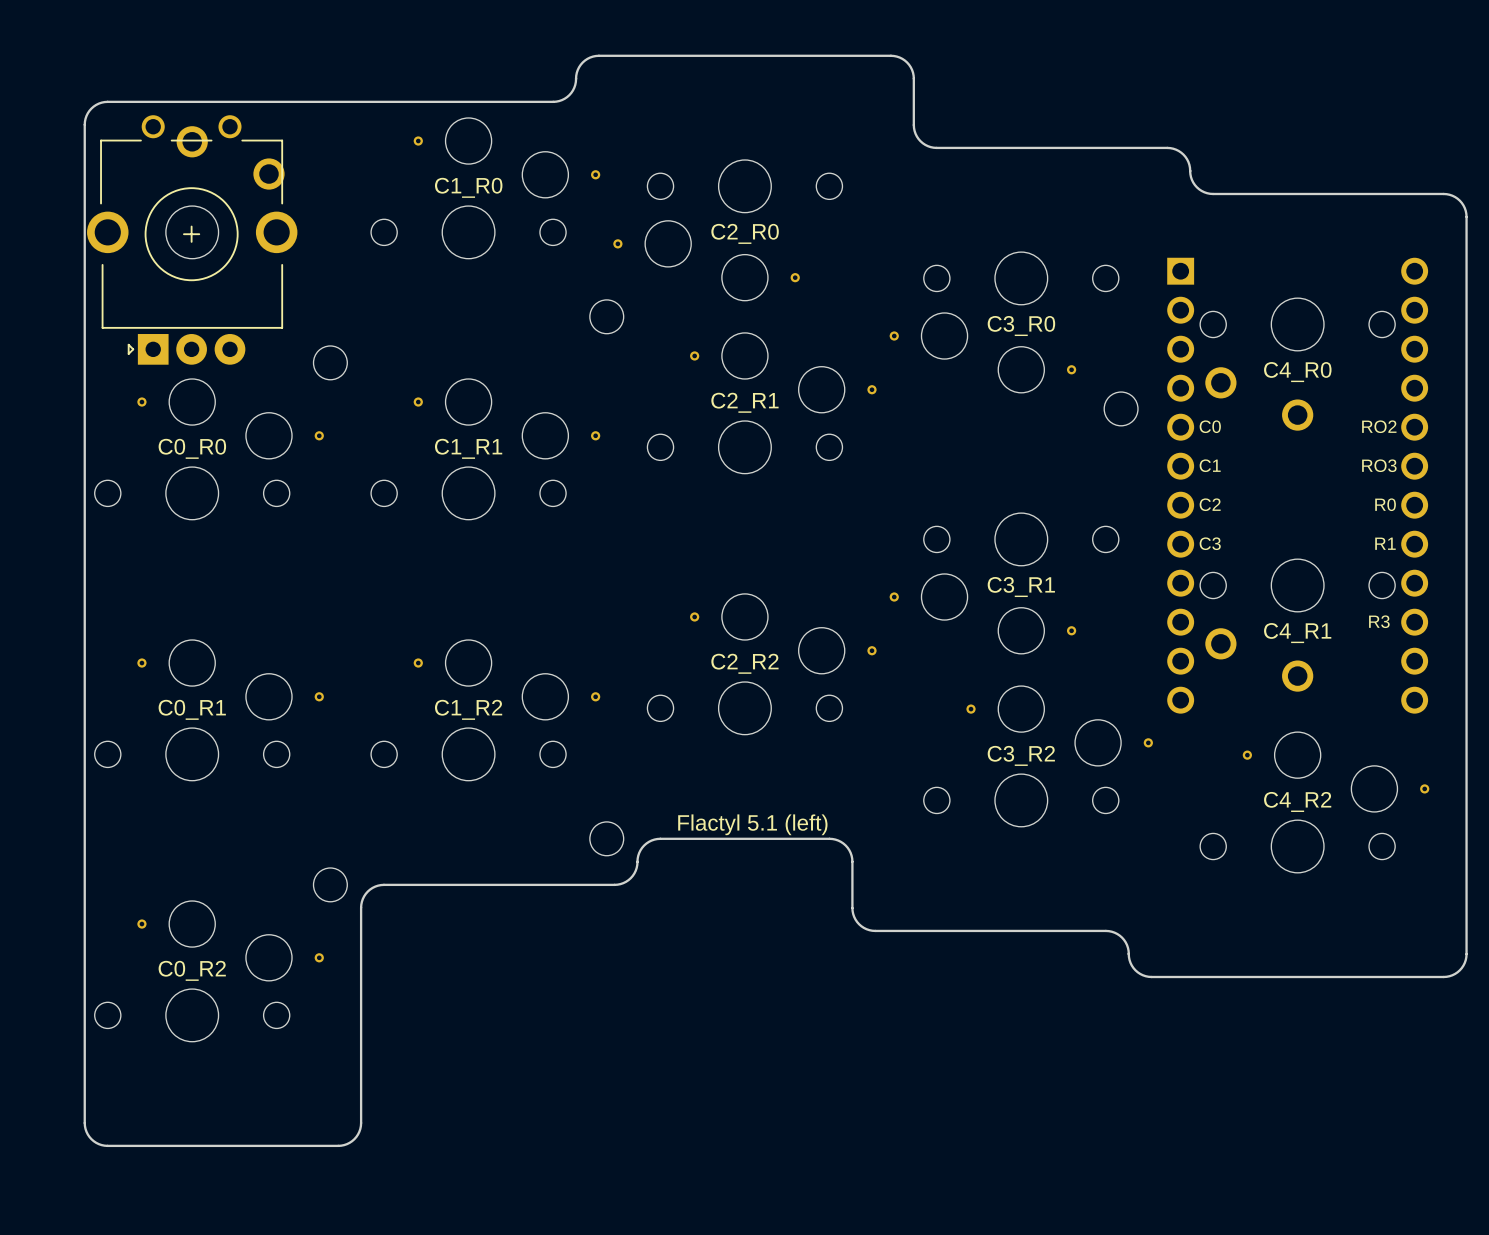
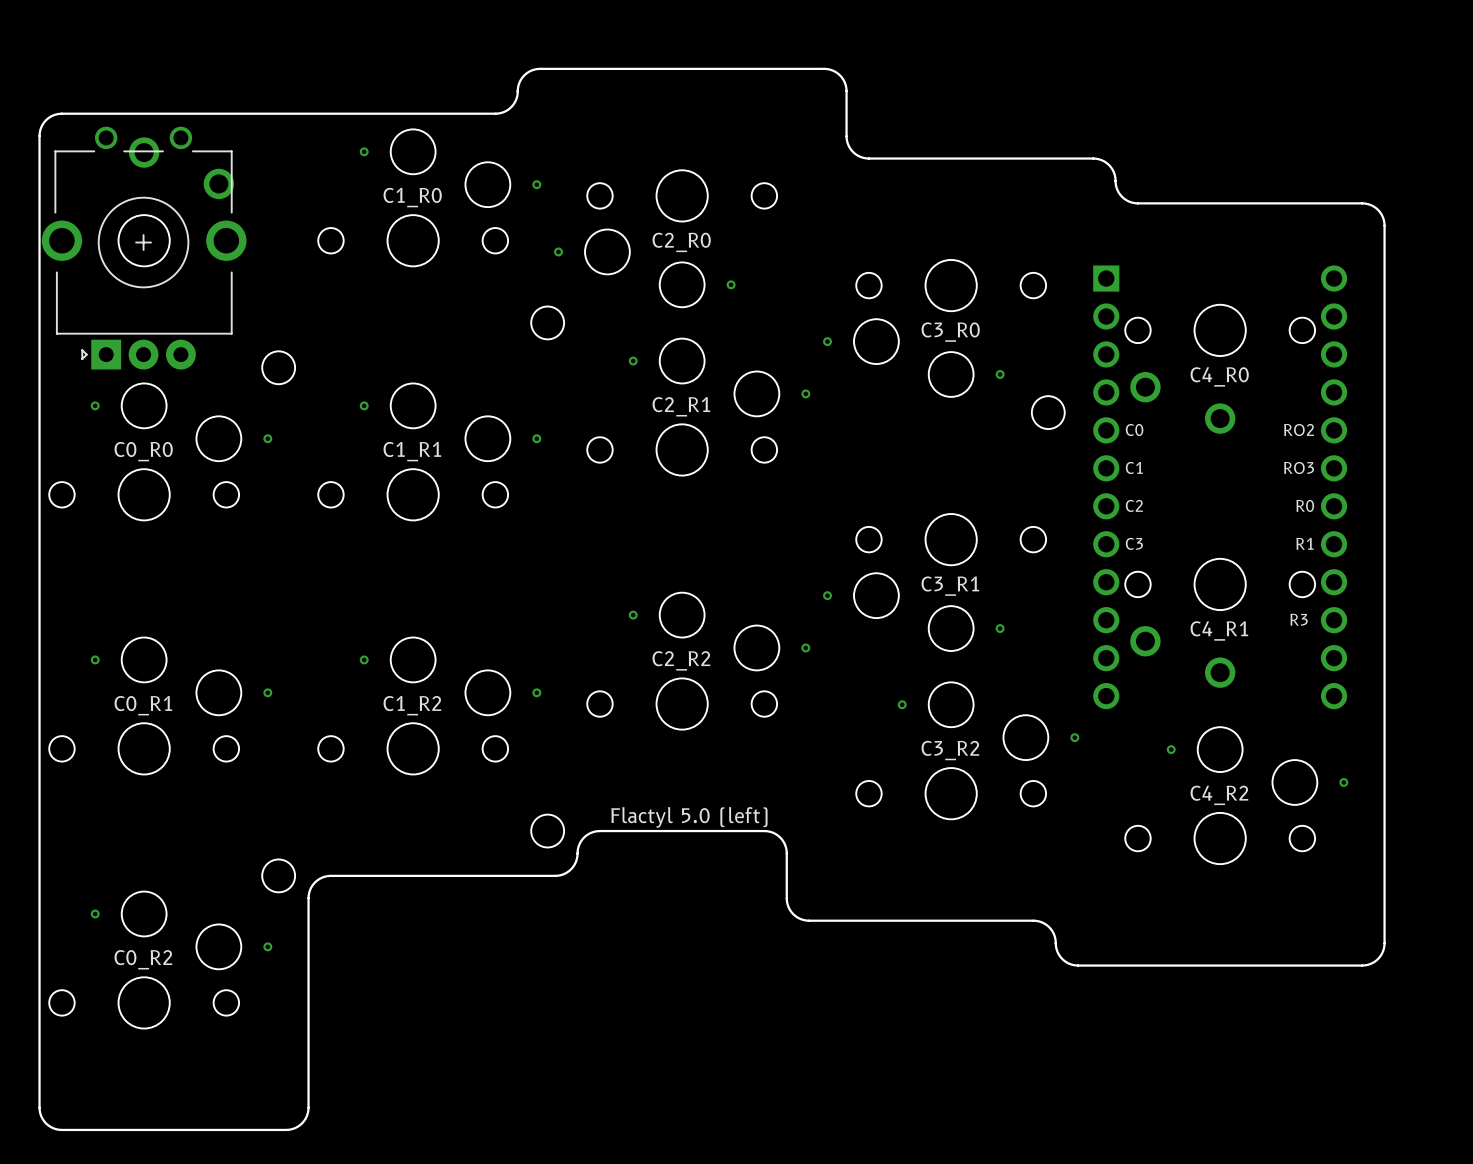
drawing shape: [678, 814, 828, 836] -> [611, 807, 768, 828]

